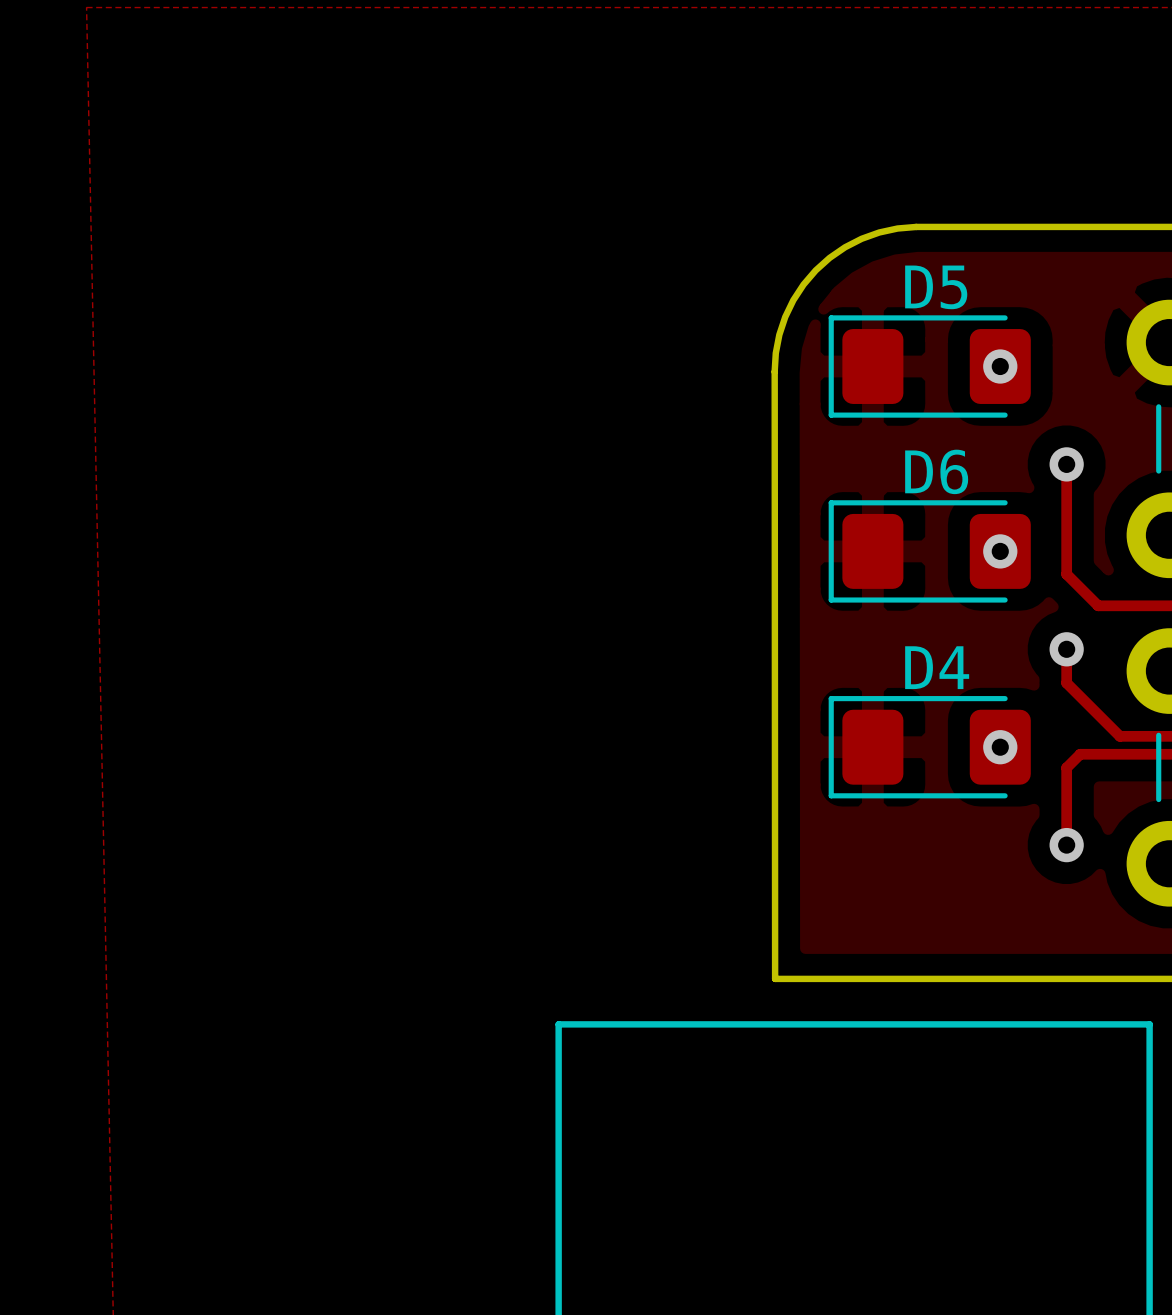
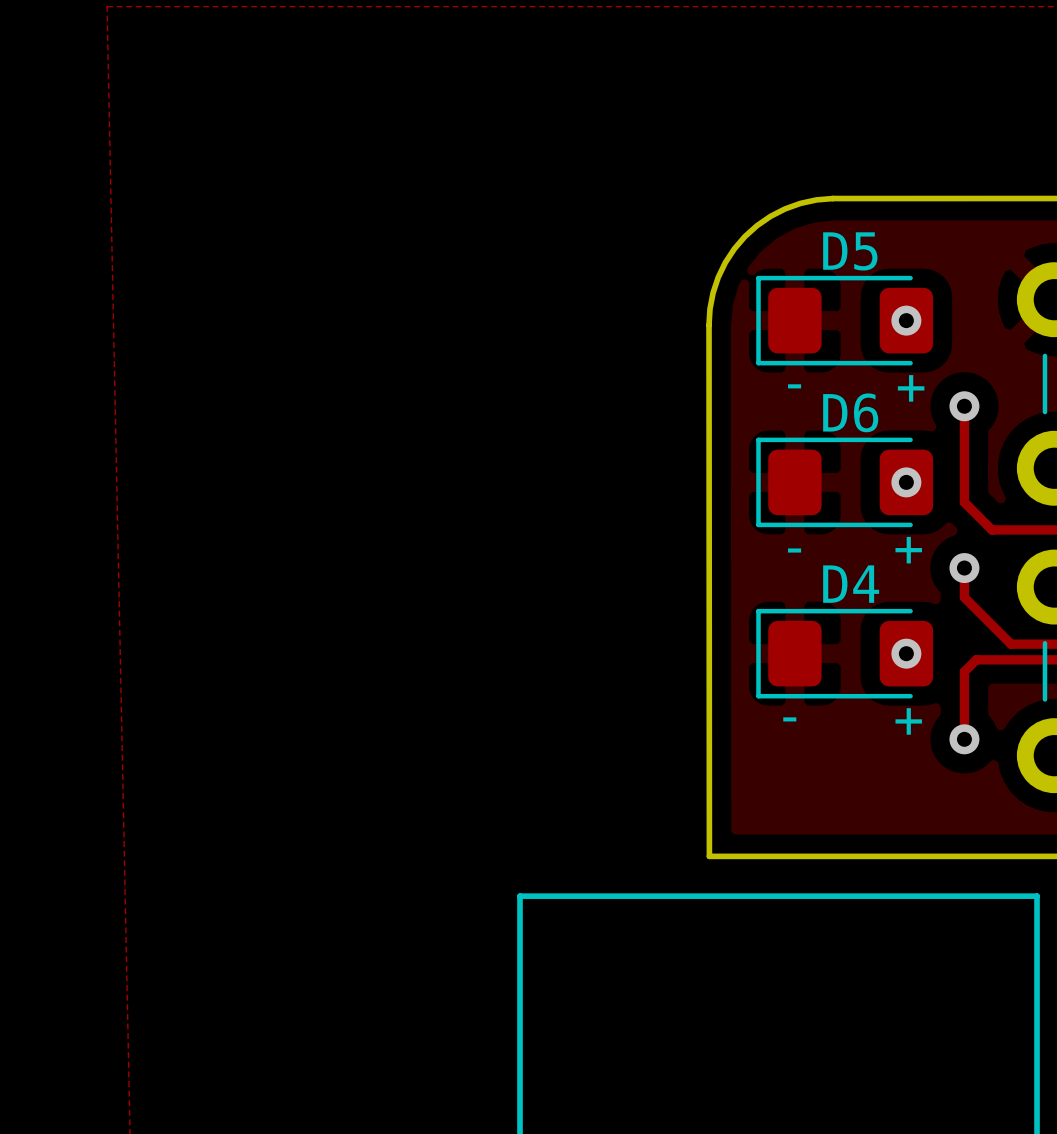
text: none -> - (794, 386)
text: none -> + (911, 388)
text: none -> + (908, 550)
text: none -> - (794, 550)
text: none -> - (789, 719)
text: none -> + (908, 721)

